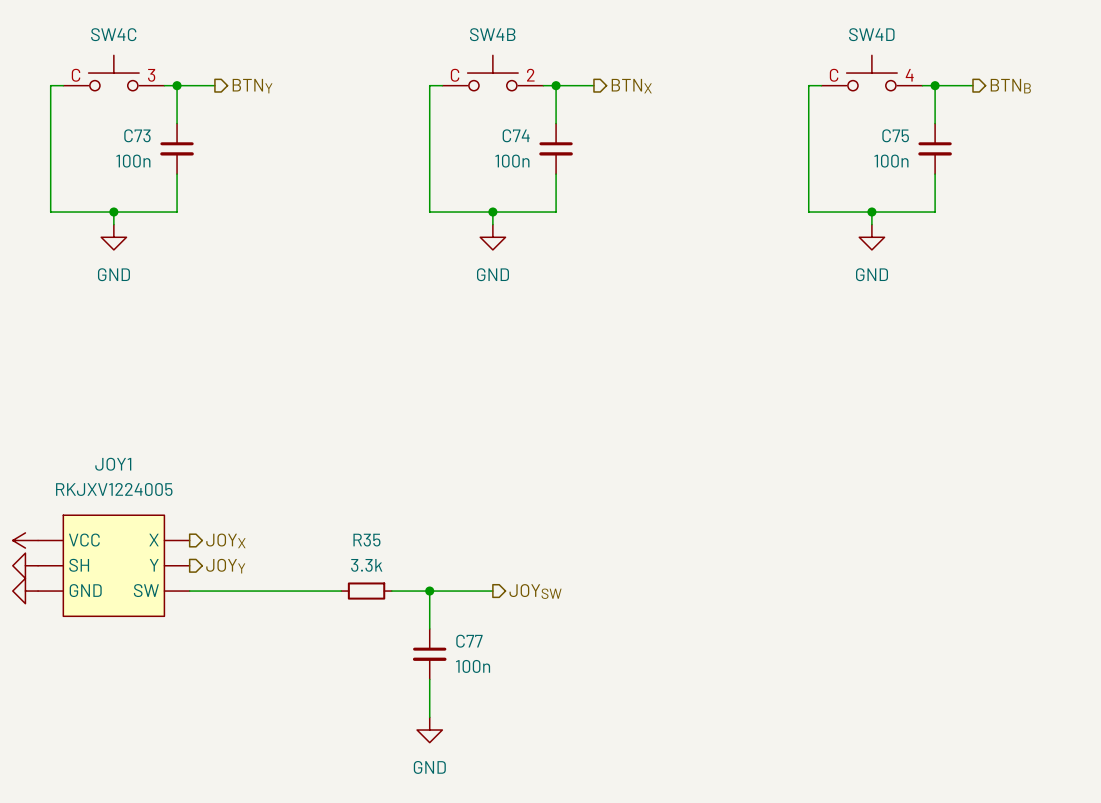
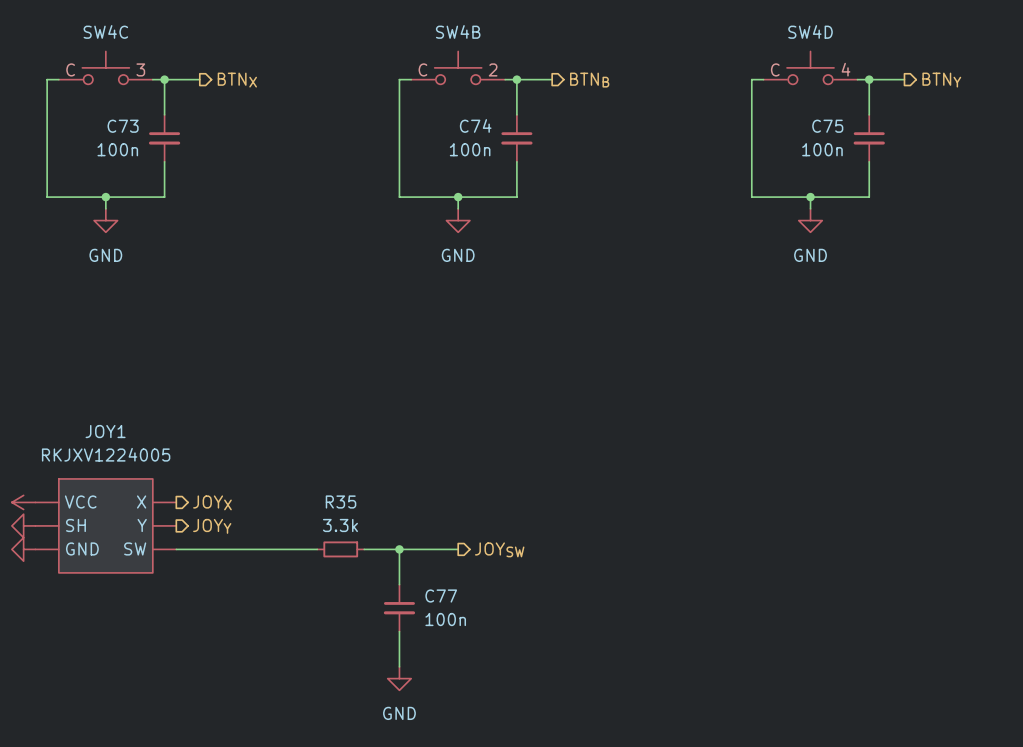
hierarchical label: BTNY (252, 86) -> BTNX (237, 80)
hierarchical label: BTNX (631, 86) -> BTNB (589, 80)
hierarchical label: BTNB (1010, 86) -> BTNY (941, 80)

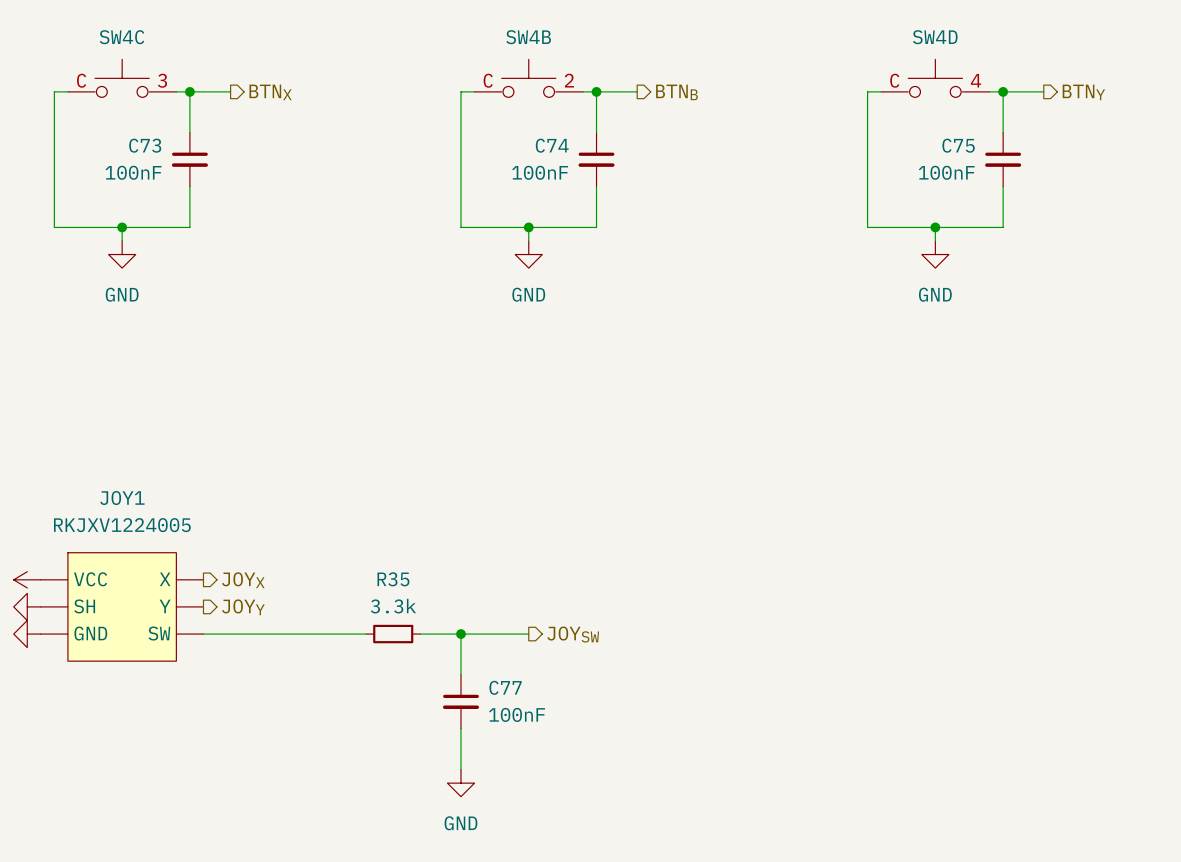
C73 value: 100n (117, 149) -> 100nF (133, 172)
C74 value: 100n (470, 149) -> 100nF (540, 172)
C75 value: 100n (822, 149) -> 100nF (946, 172)
C77 value: 100n (445, 619) -> 100nF (517, 714)

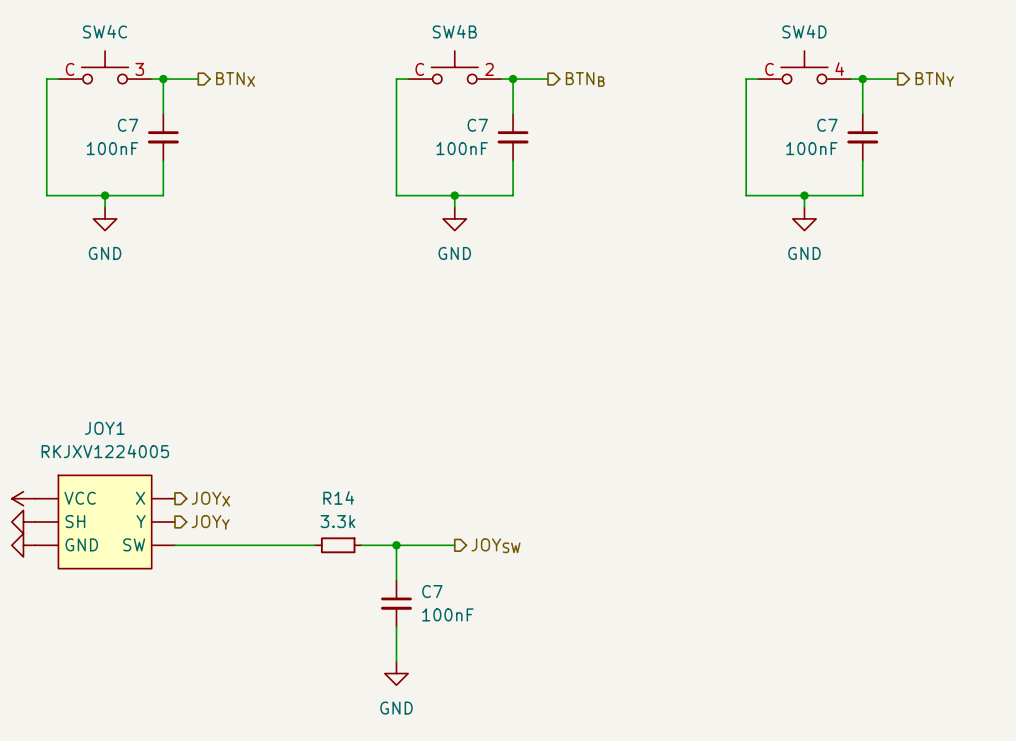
C73 name: C73 (145, 145) -> C7 (128, 125)
C74 name: C74 (552, 145) -> C7 (477, 125)
C75 name: C75 (958, 145) -> C7 (827, 125)
R35 name: R35 (393, 579) -> R14 (338, 497)
C77 name: C77 (505, 687) -> C7 (432, 591)

